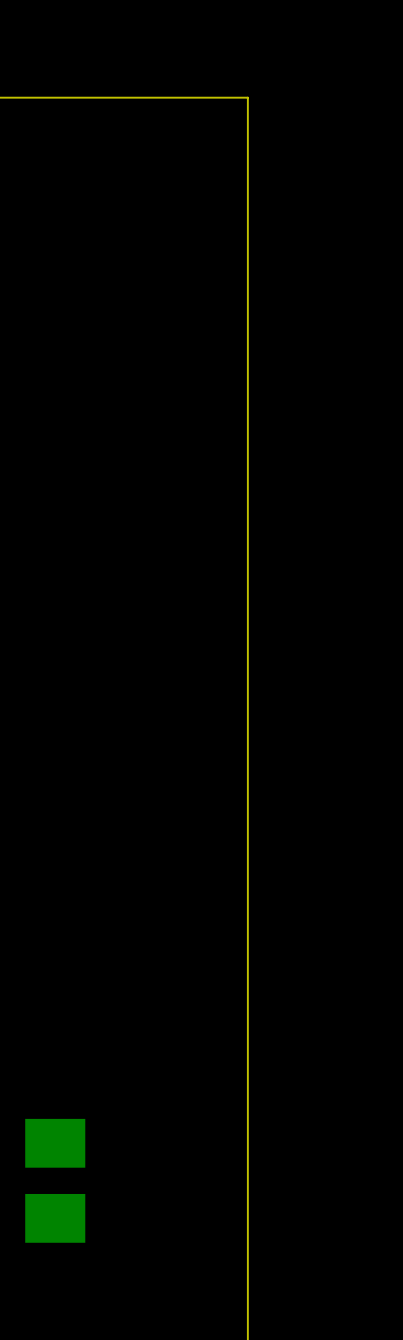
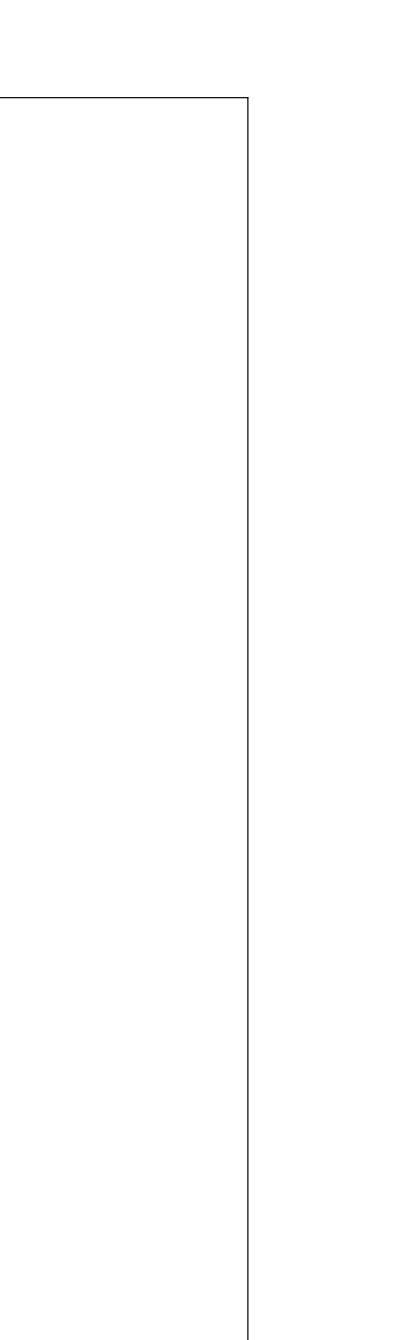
part: (55, 1180) -> none

